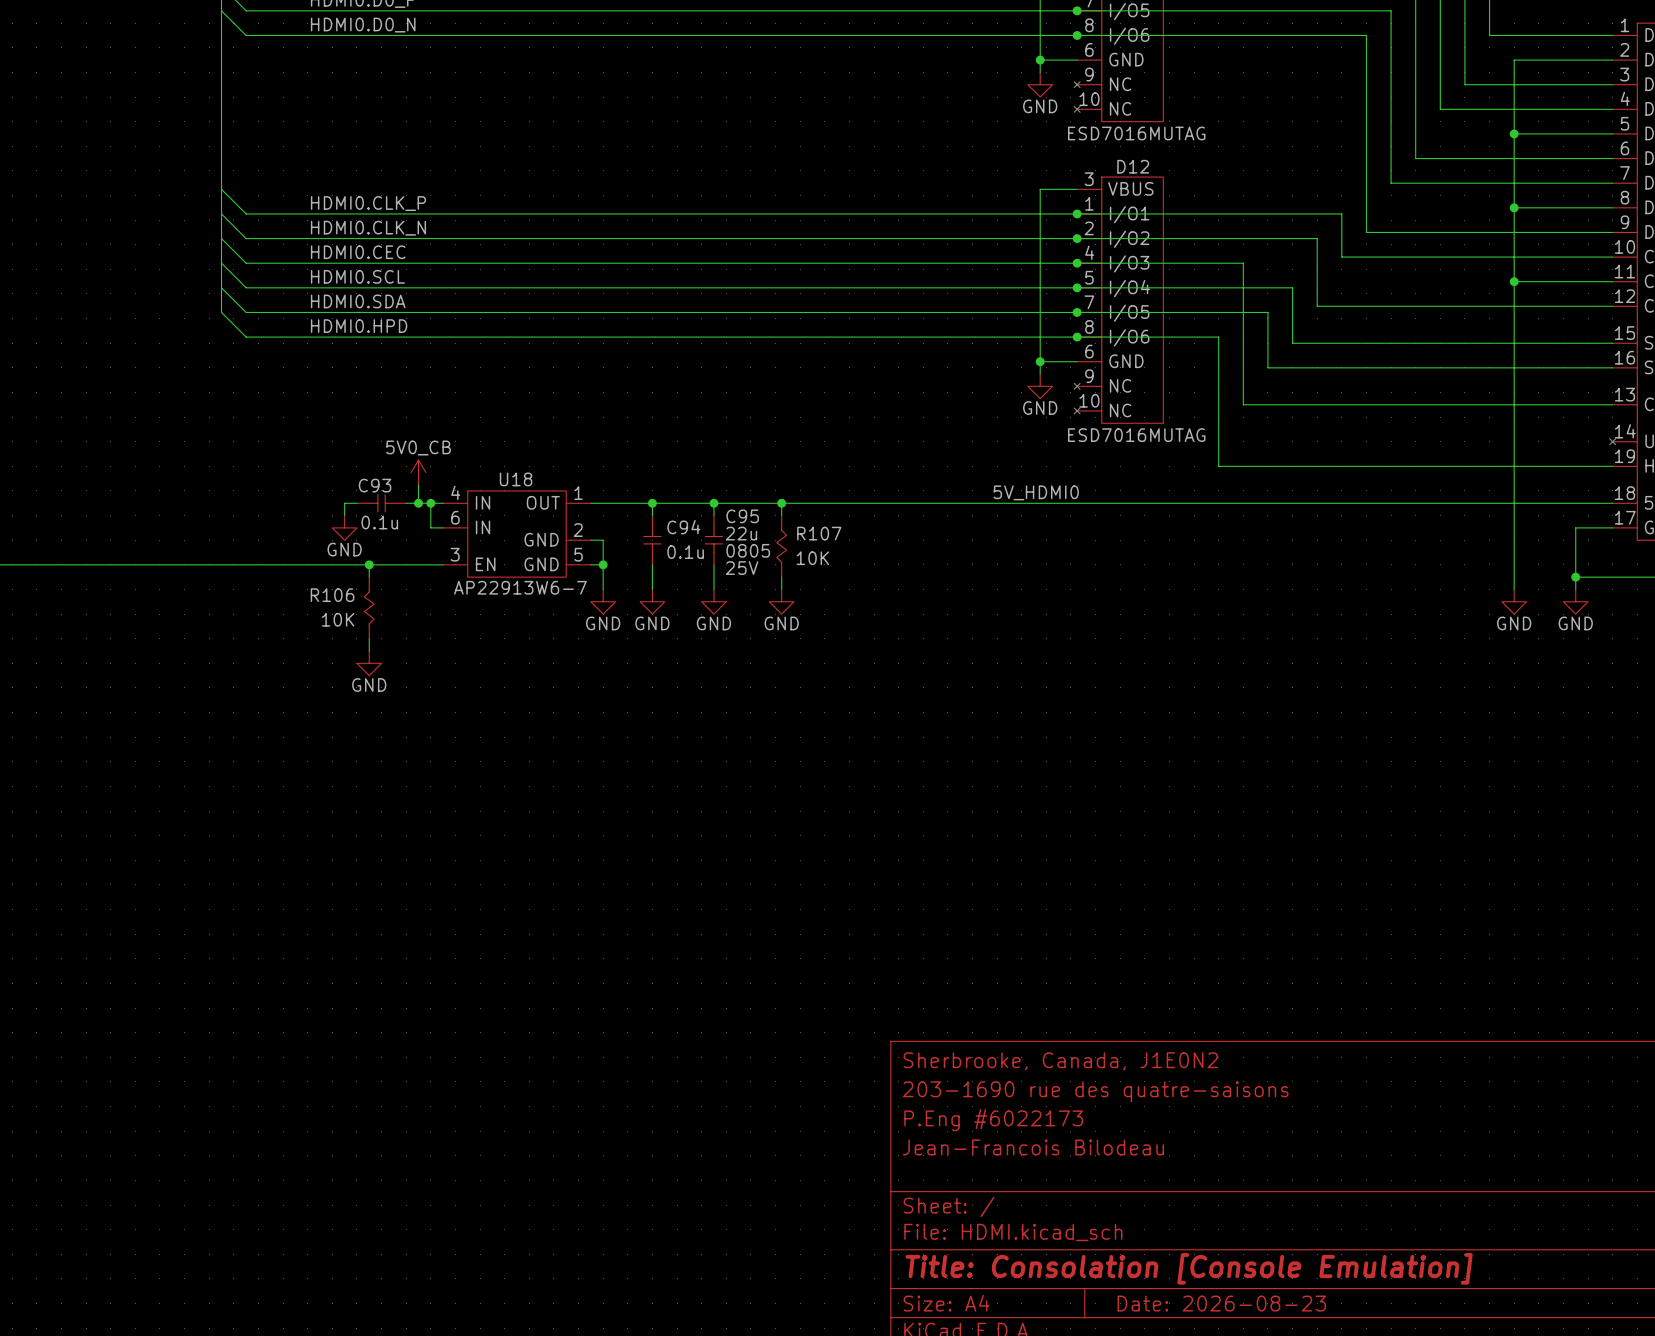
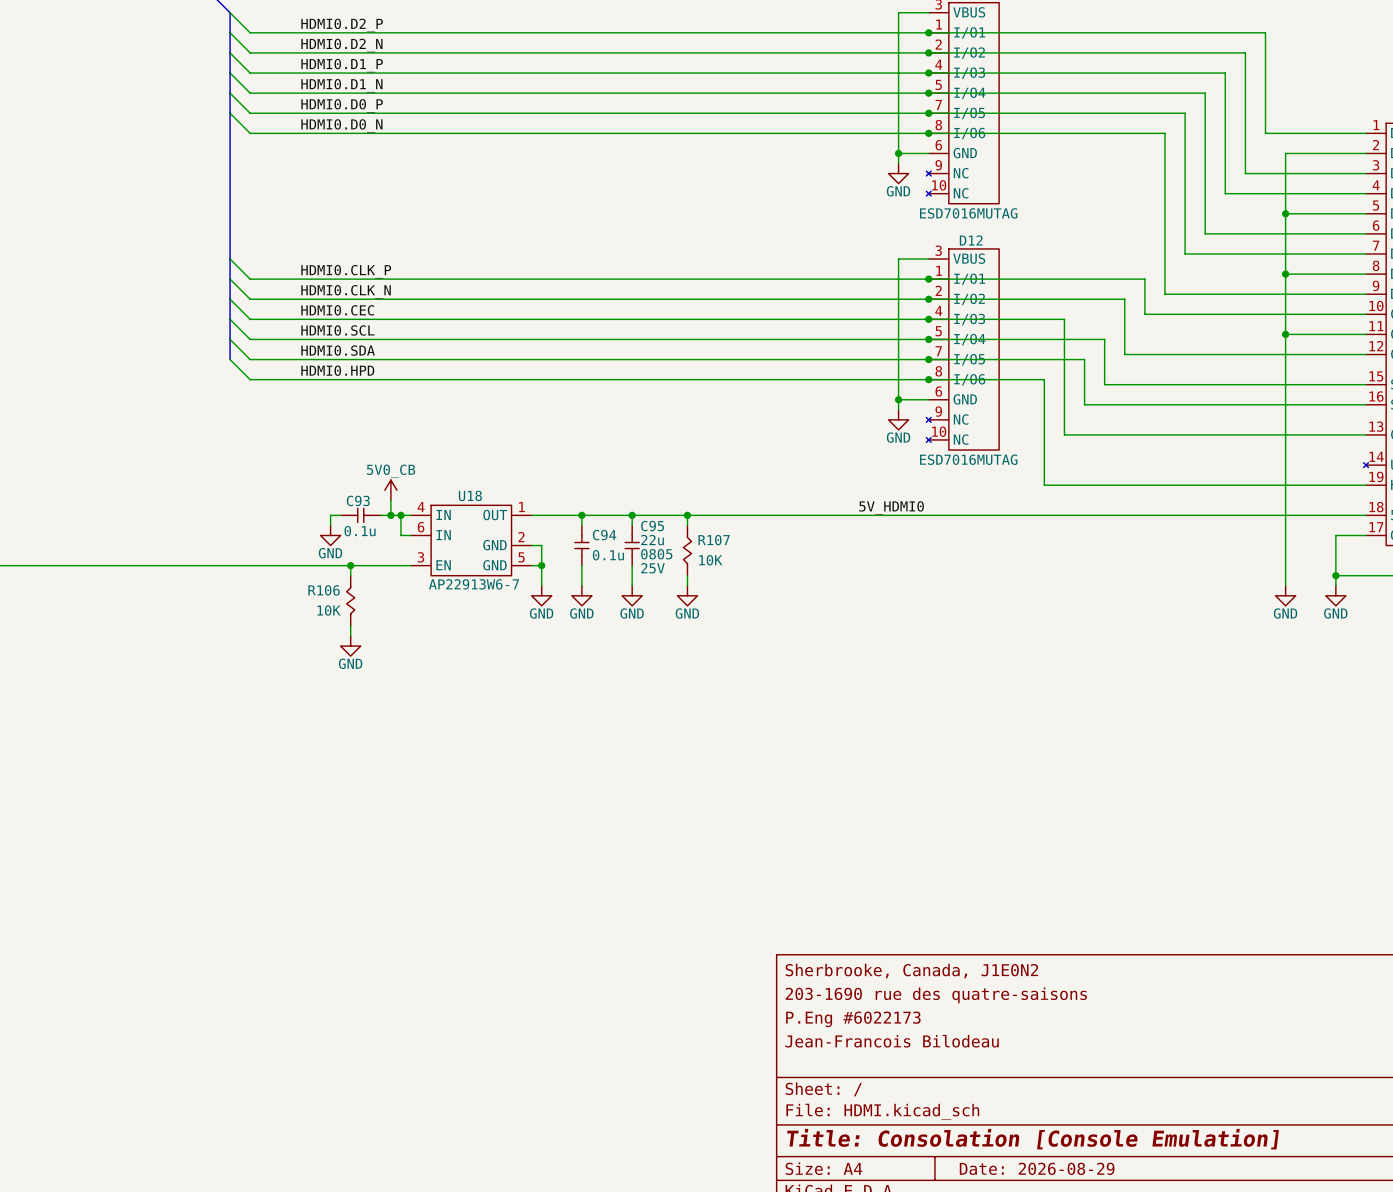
title block: Date: 2026-08-23 (1221, 1303) -> Date: 2026-08-29 (1037, 1168)

